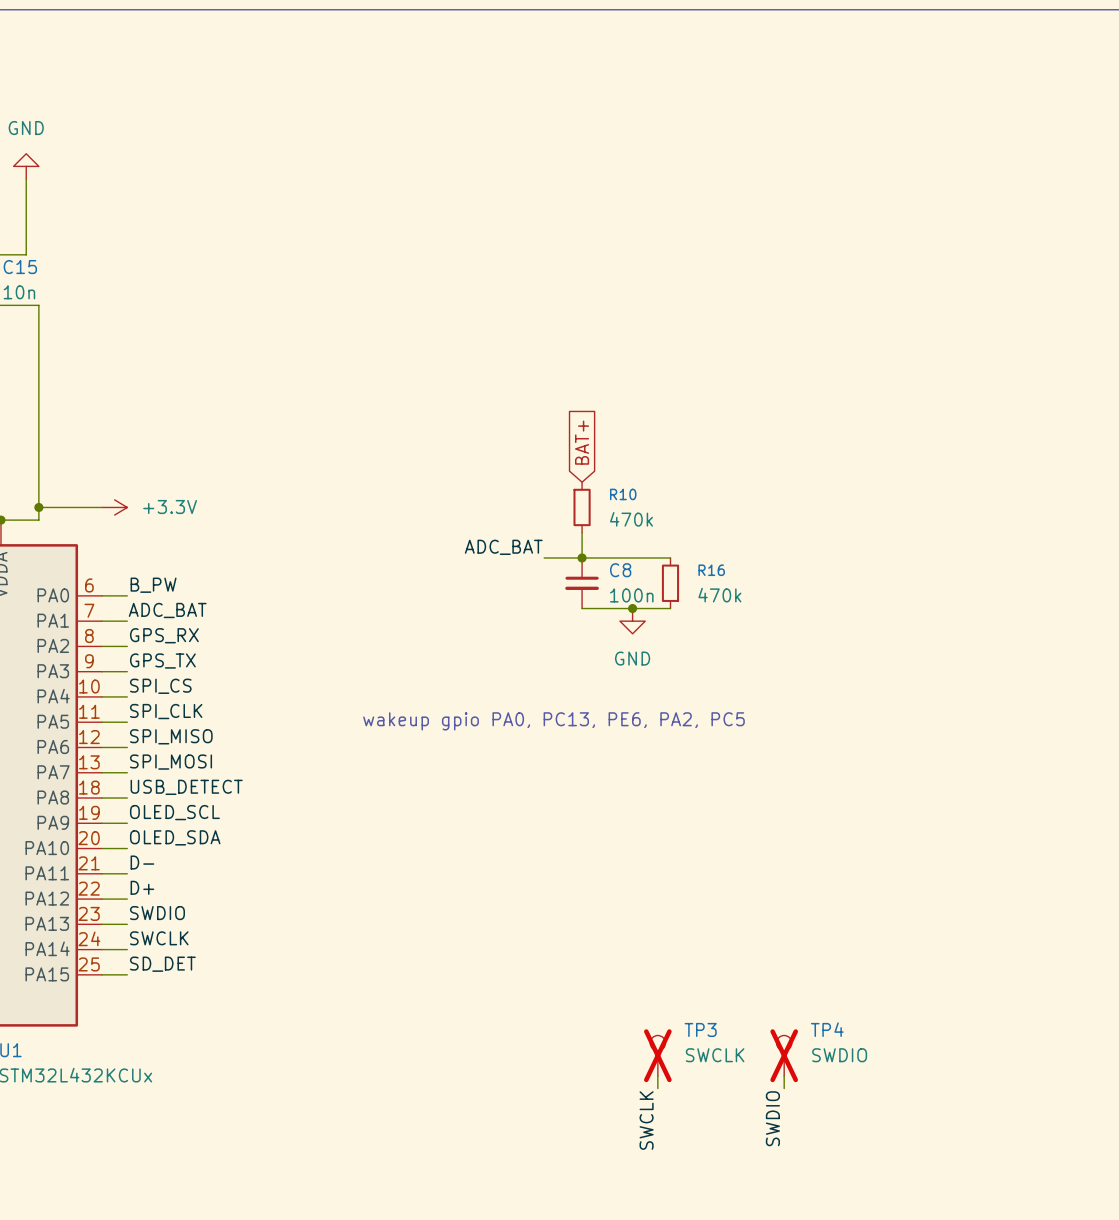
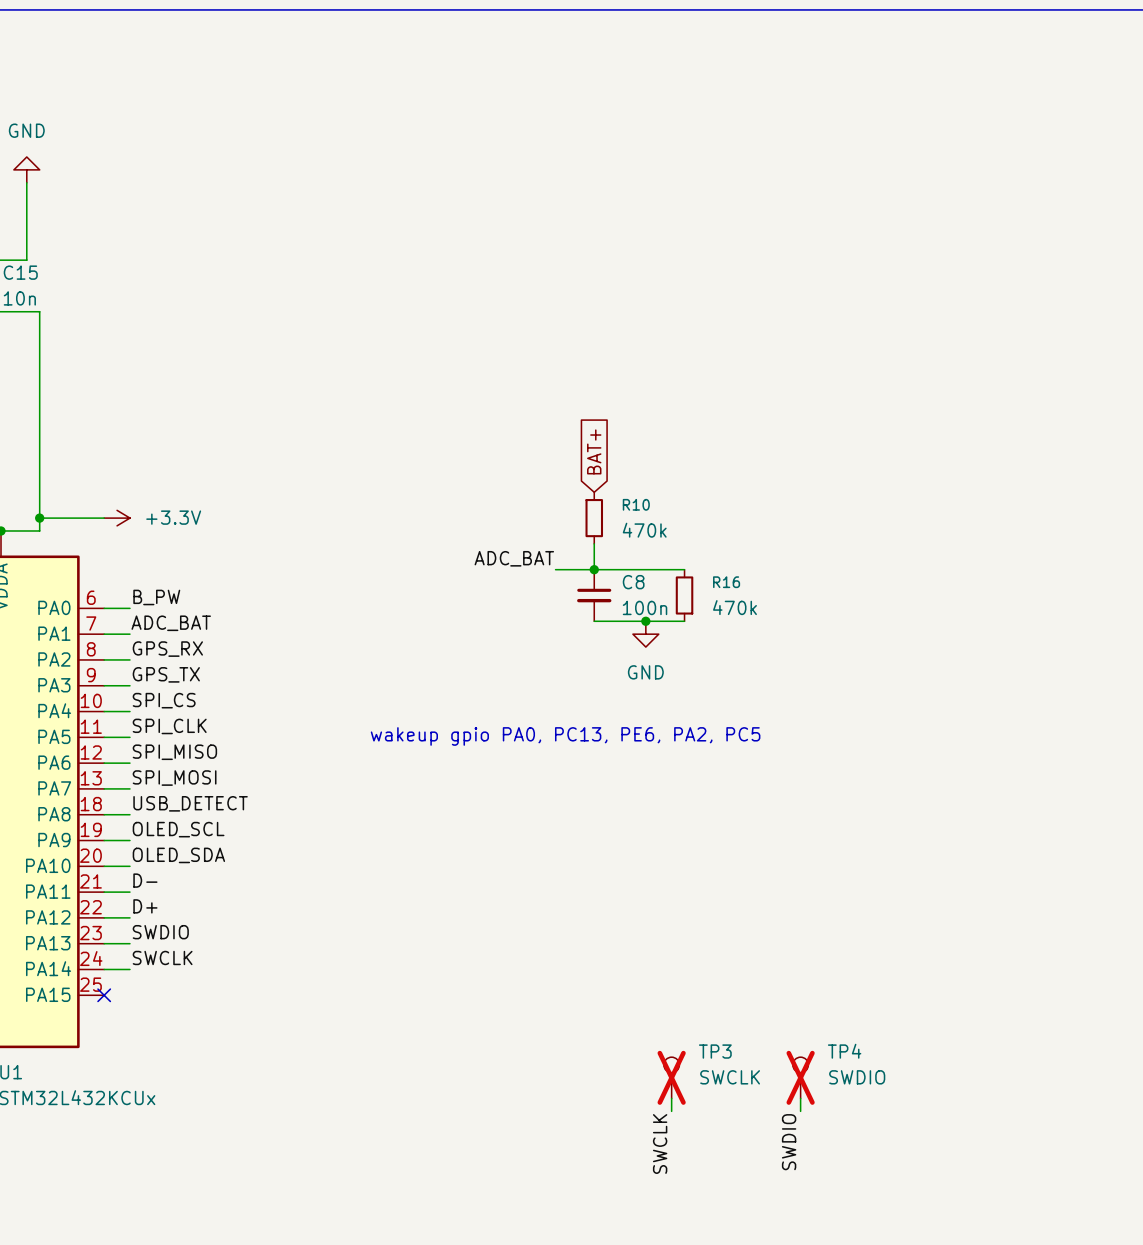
label: SD_DET (162, 964) -> none
wire: (102, 974) (127, 974) -> none
no-connect mark: none -> (104, 995)

